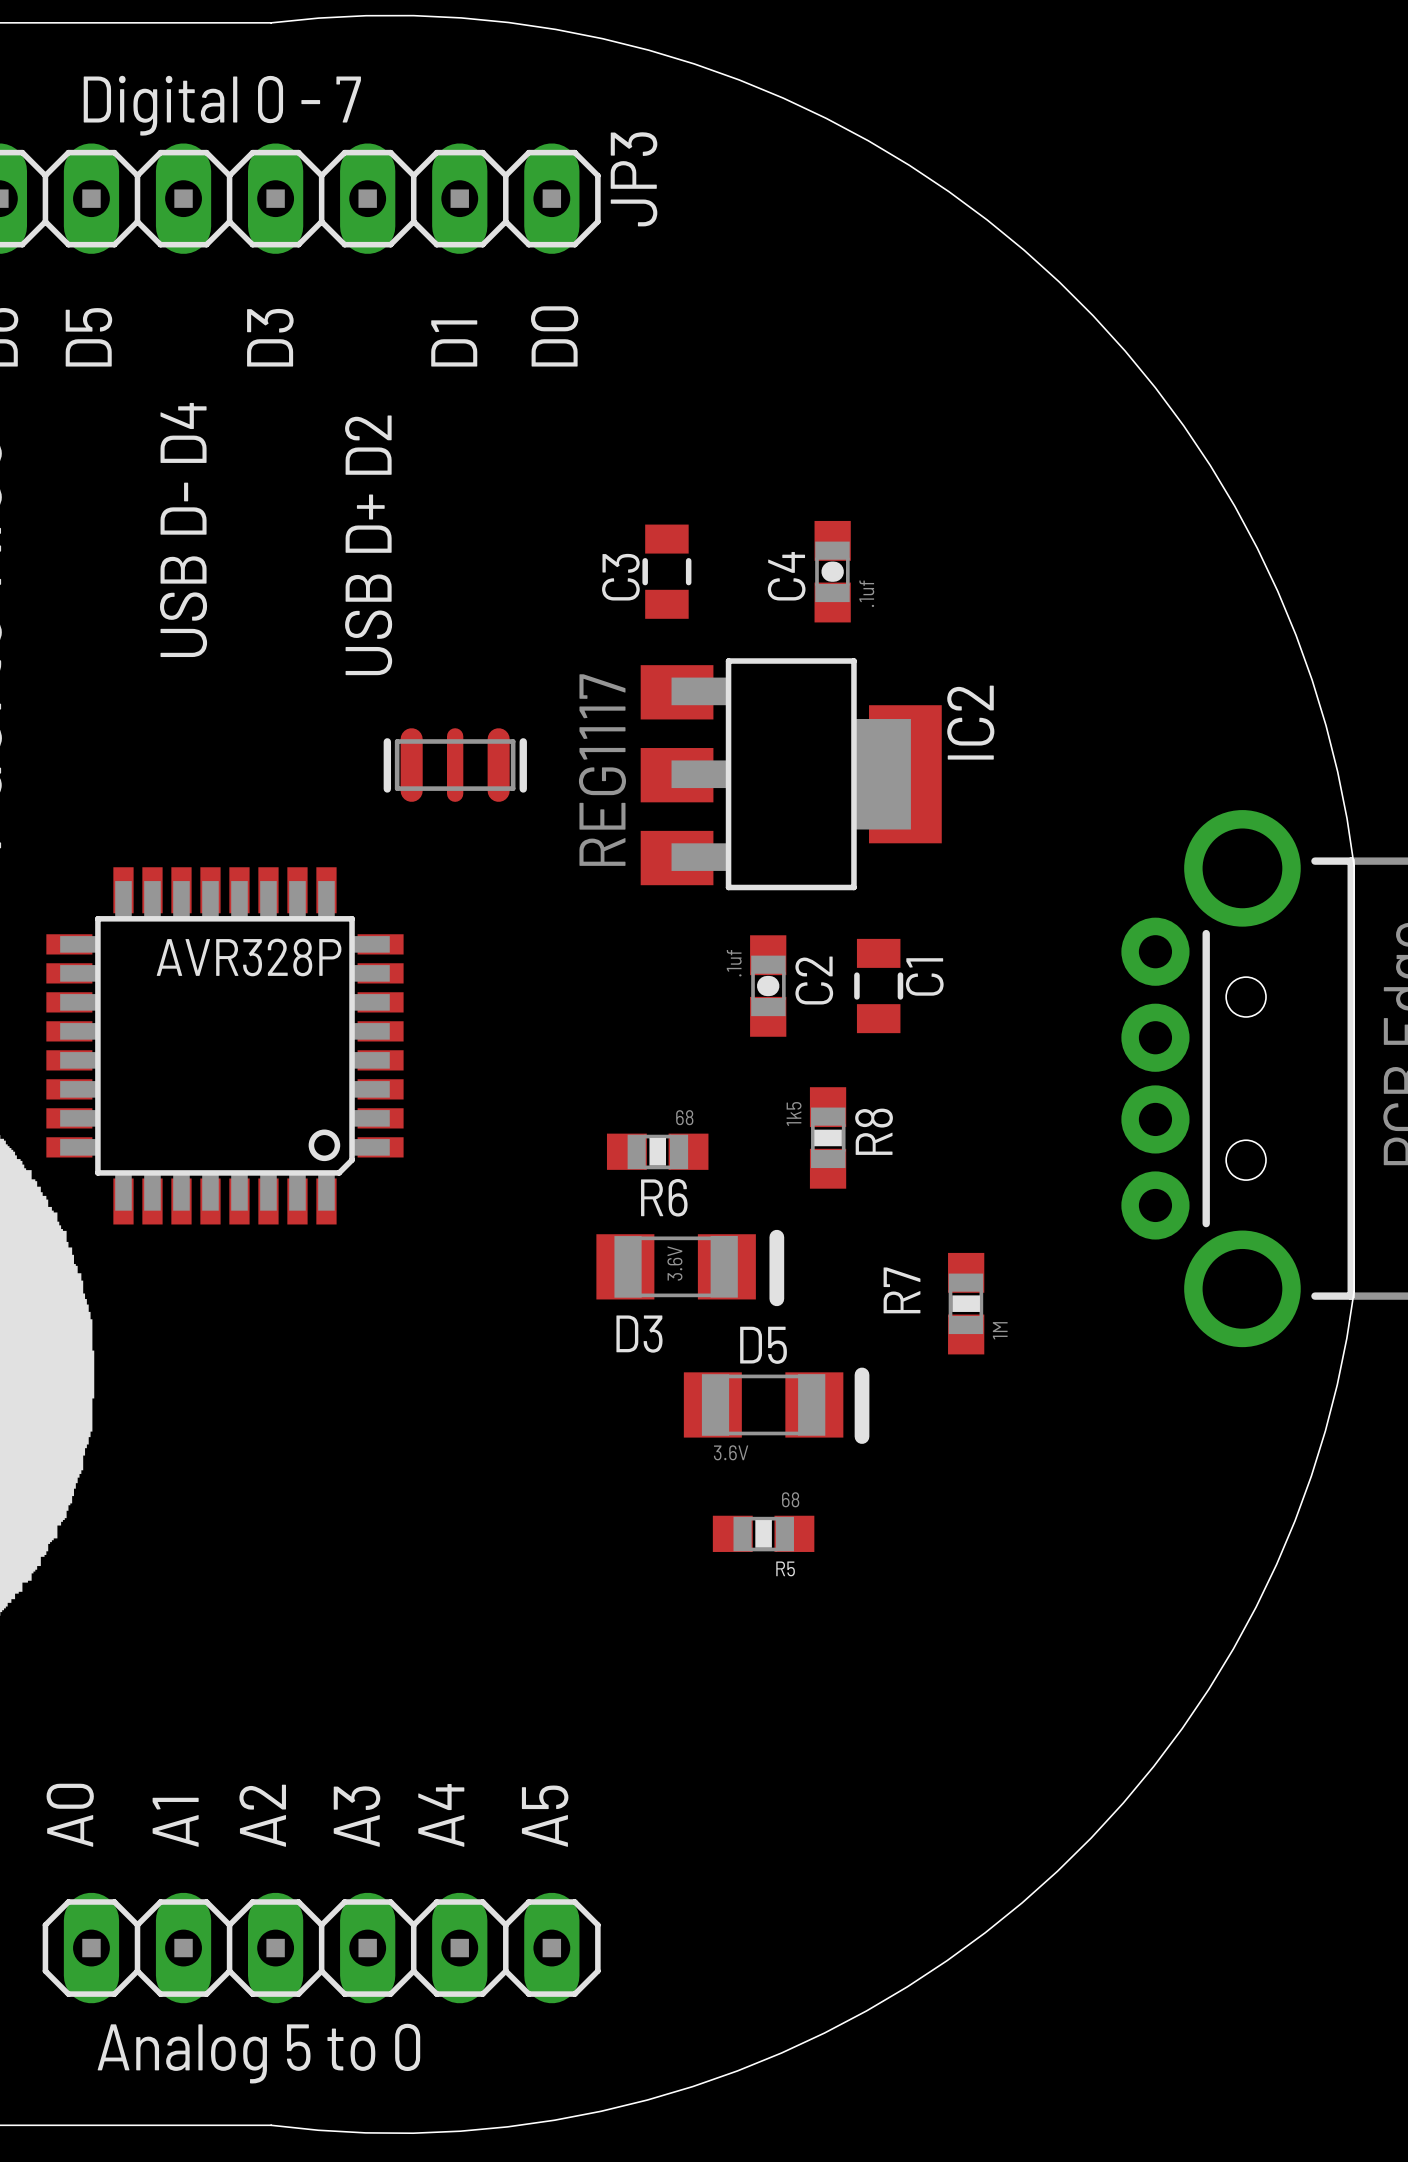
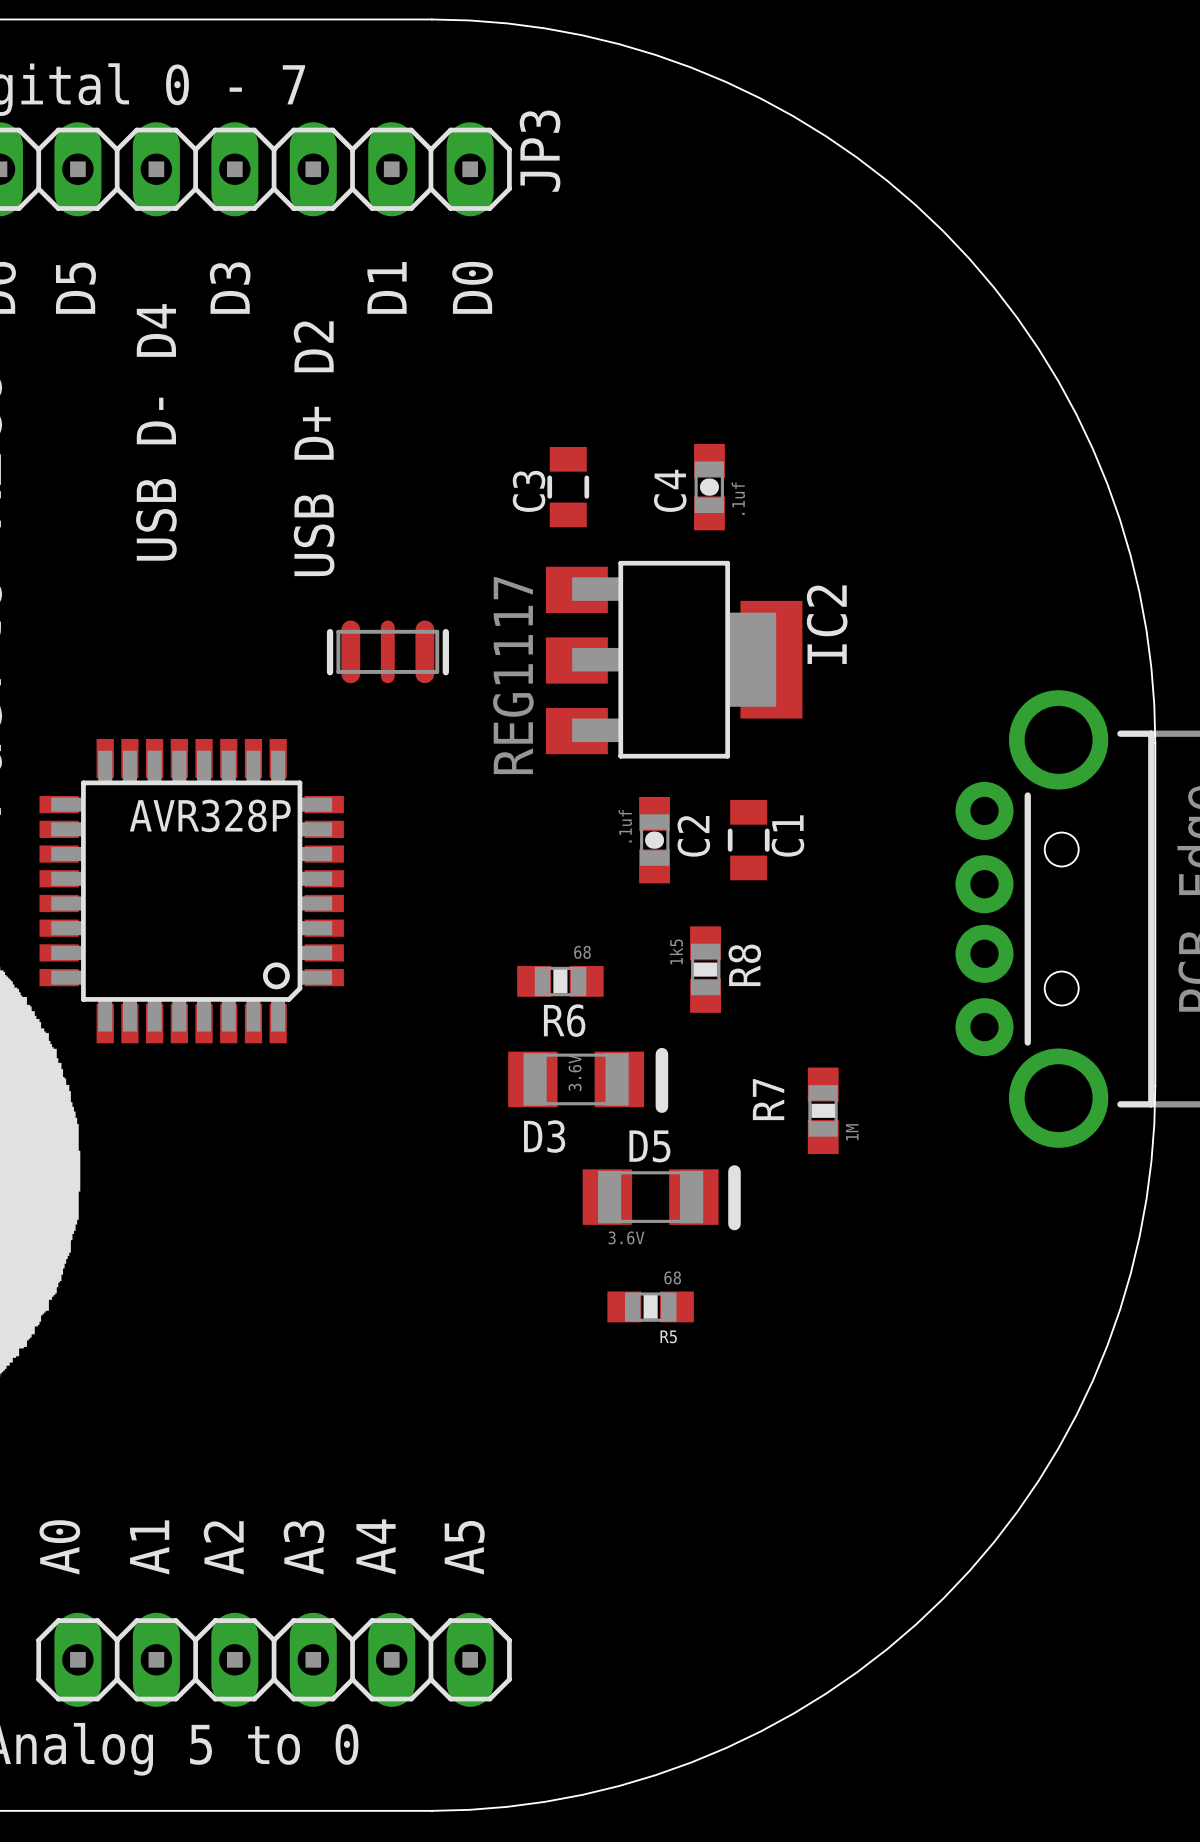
board edge: (271, 22) (366, 15) (461, 17) (555, 29) (648, 50) (739, 79) (826, 118) (909, 165) (987, 219) (1059, 282) (1125, 350) (1183, 425) (1234, 506) (1277, 591) (1312, 680) (1337, 771) (1354, 865) (1354, 1291) (1337, 1384) (1325, 1430) (1295, 1520) (1256, 1607) (1208, 1689) (1182, 1728) (1123, 1802) (1091, 1837) (1022, 1902) (947, 1960) (866, 2010) (824, 2033) (737, 2070) (647, 2100) (601, 2111) (507, 2126) (460, 2131) (365, 2132) (271, 2125) -> (231, 19) (469, 20) (545, 28) (619, 44) (691, 67) (760, 98) (825, 136) (887, 180) (943, 231) (994, 287) (1038, 348) (1076, 414) (1107, 483) (1130, 555) (1139, 592) (1151, 667) (1155, 742) (1154, 1123) (1146, 1199) (1139, 1236) (1120, 1309) (1107, 1345) (1076, 1414) (1038, 1480) (994, 1541) (969, 1570) (943, 1598) (887, 1648) (826, 1693) (760, 1731) (726, 1747) (655, 1775) (582, 1794) (507, 1806) (431, 1810) (231, 1810)

